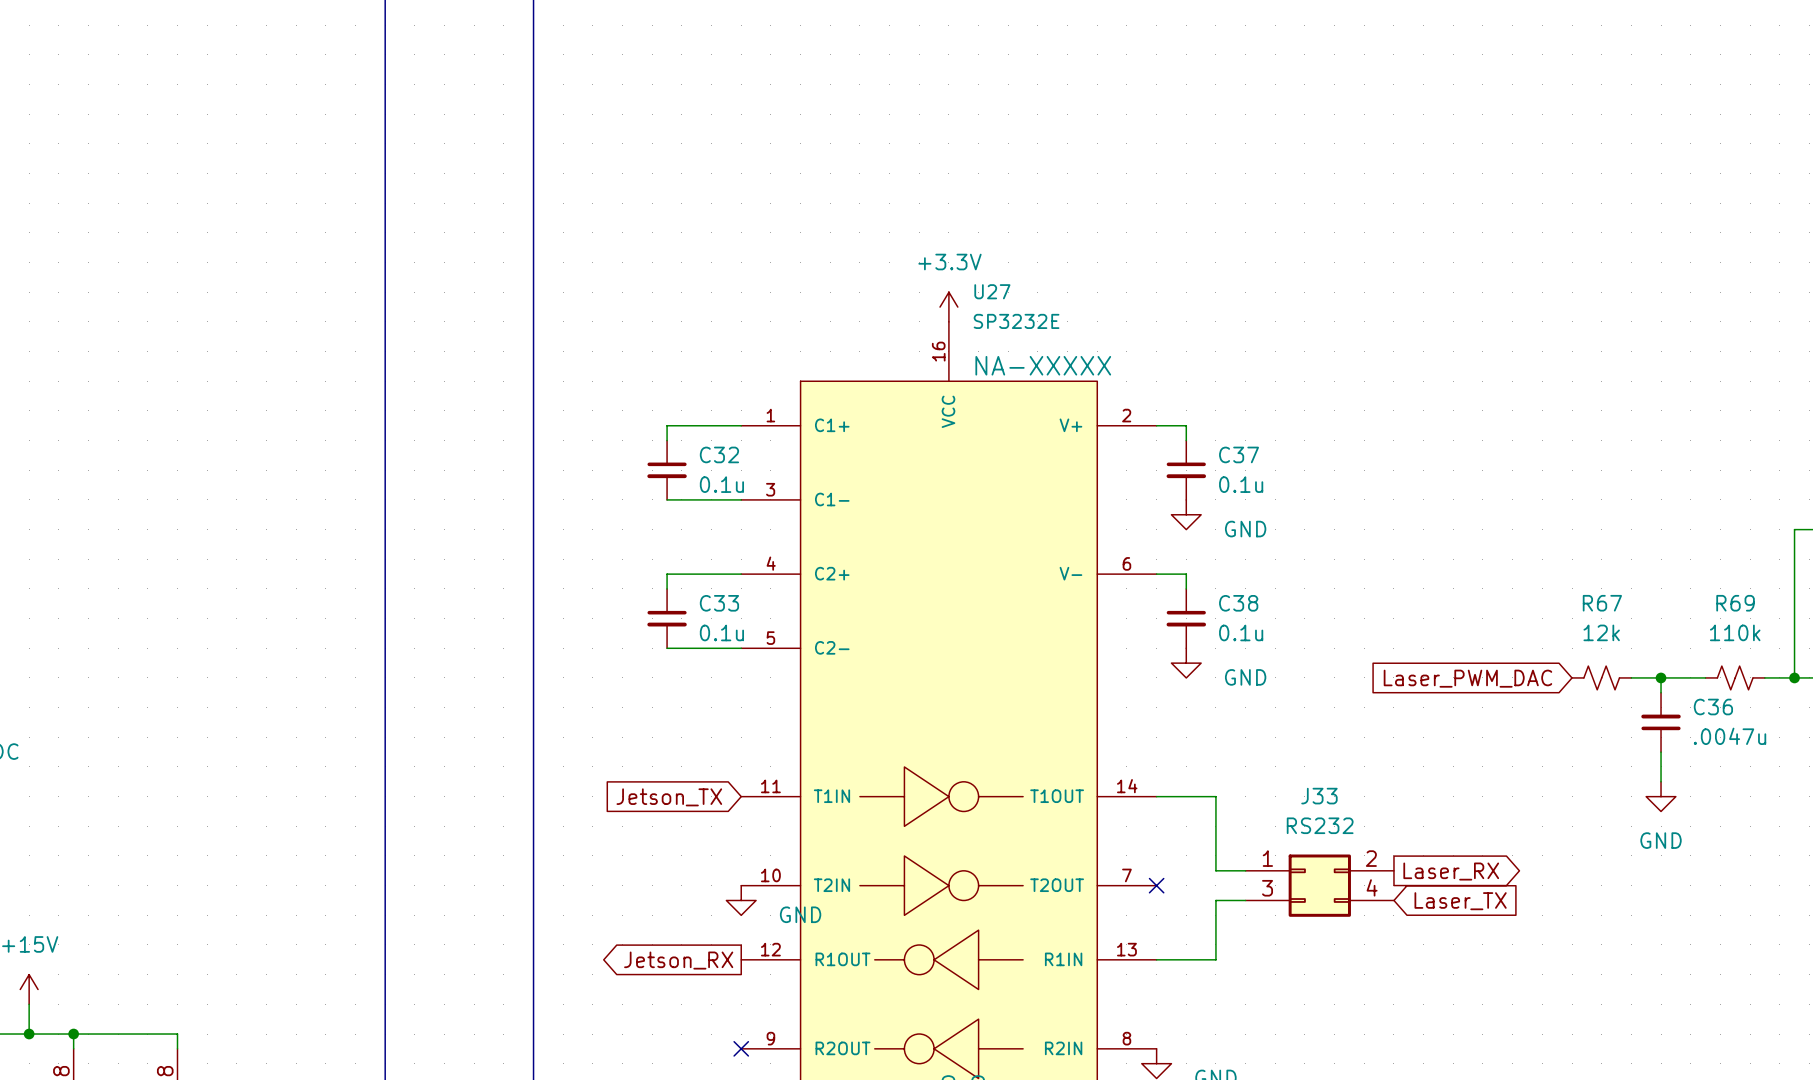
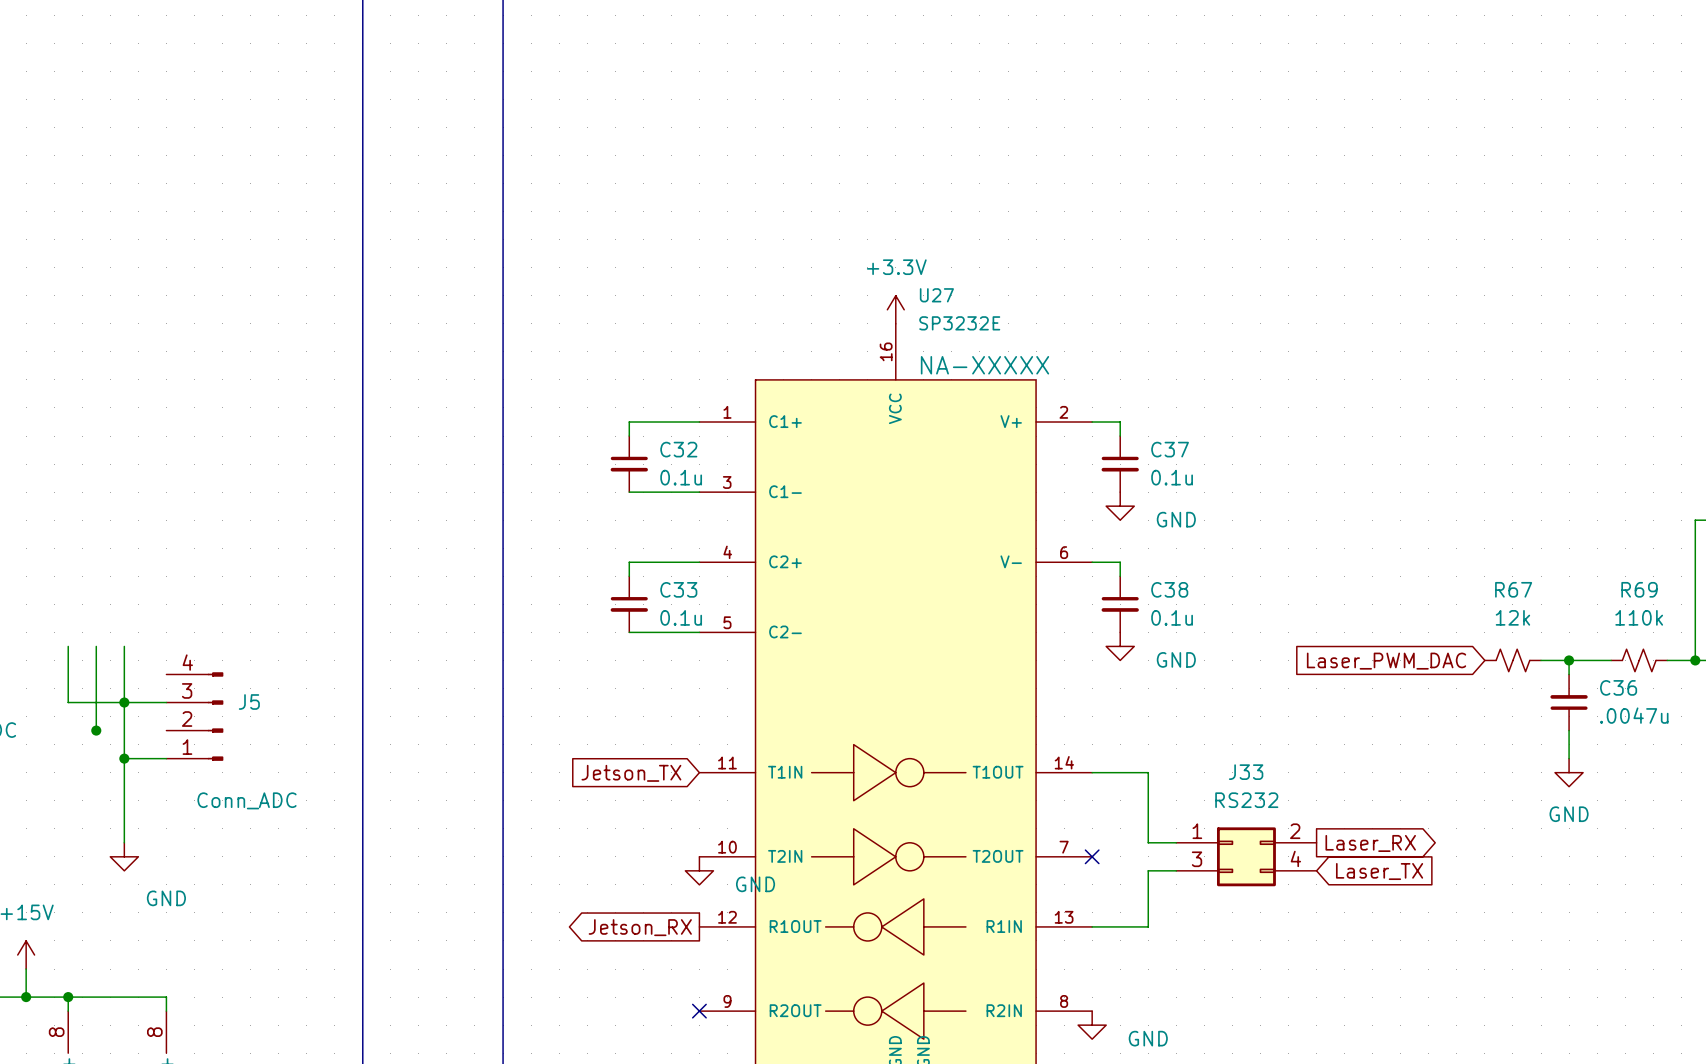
wire: none -> (68, 646) (68, 702) (166, 702)
wire: none -> (96, 646) (96, 730)
wire: none -> (124, 646) (124, 842)
junction: none -> (124, 702)
J5: none -> Conn_ADC (194, 716)
junction: none -> (96, 730)
wire: none -> (124, 758) (166, 758)
junction: none -> (124, 758)
power symbol: none -> GND (124, 856)

